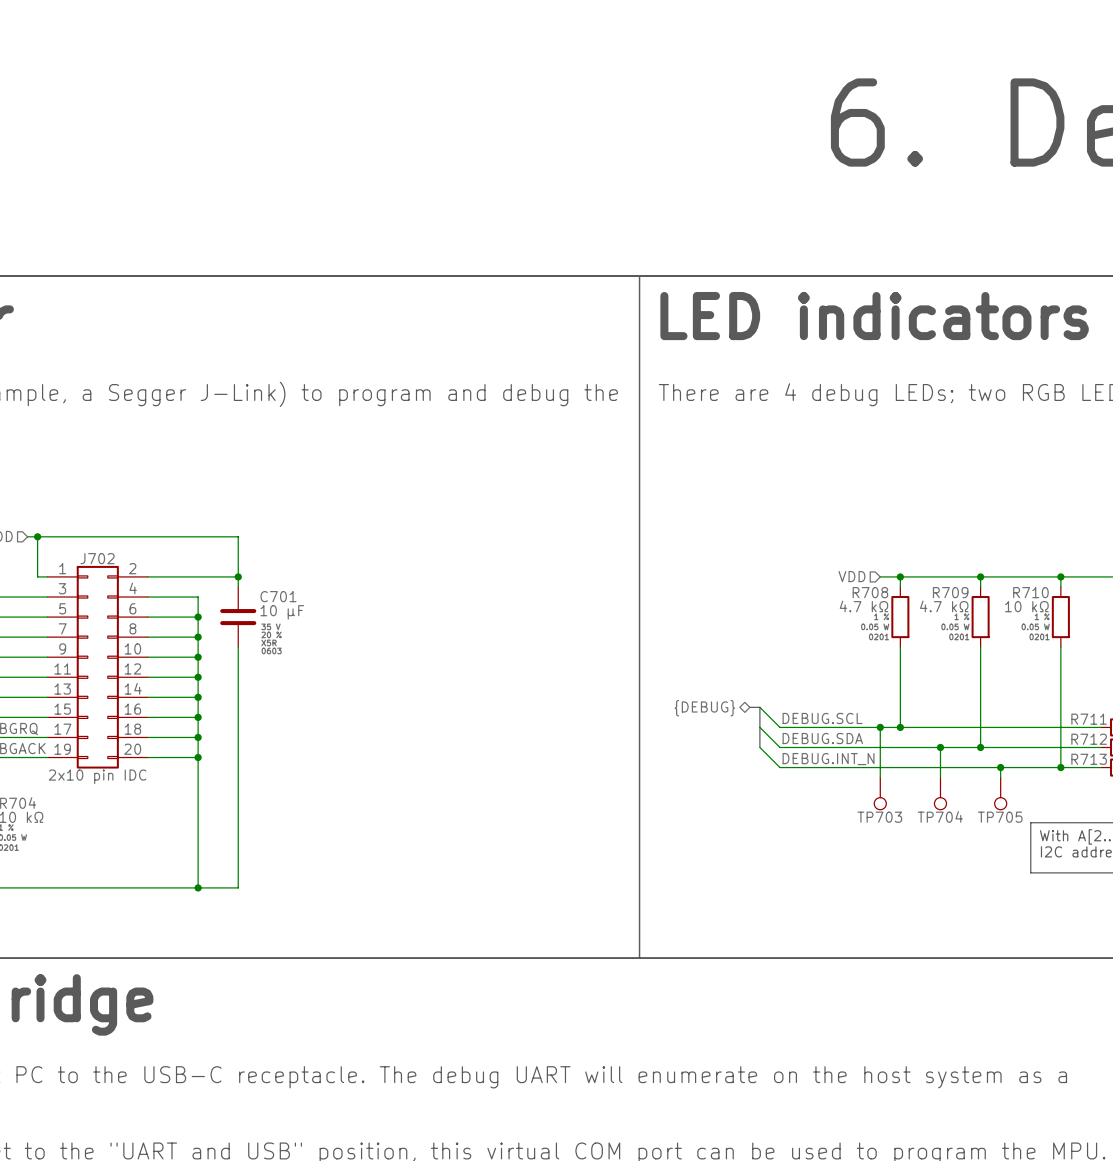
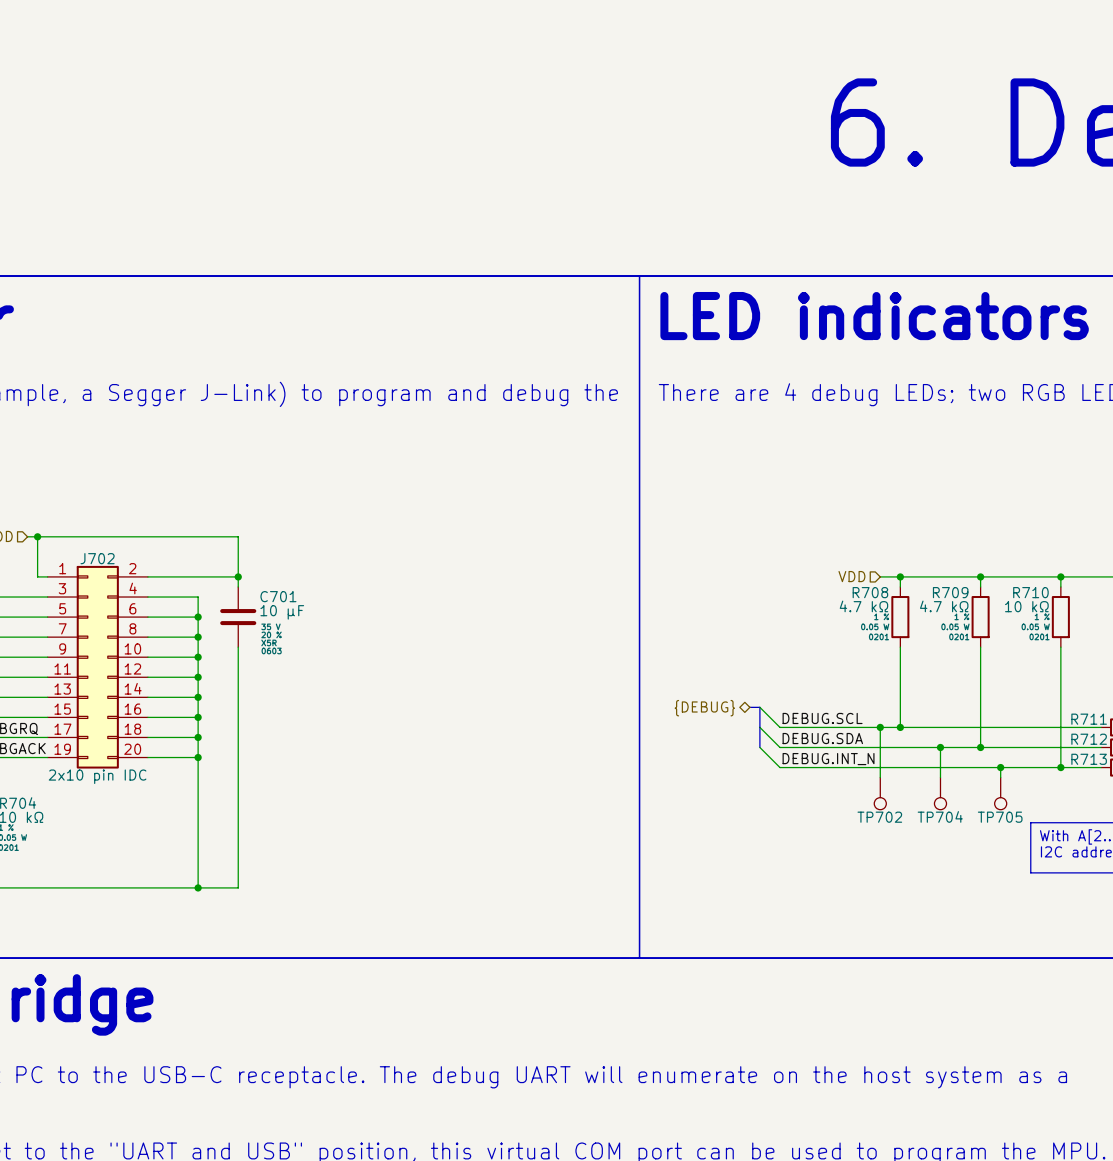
TP703 name: TP703 (879, 817) -> TP702 (879, 817)

